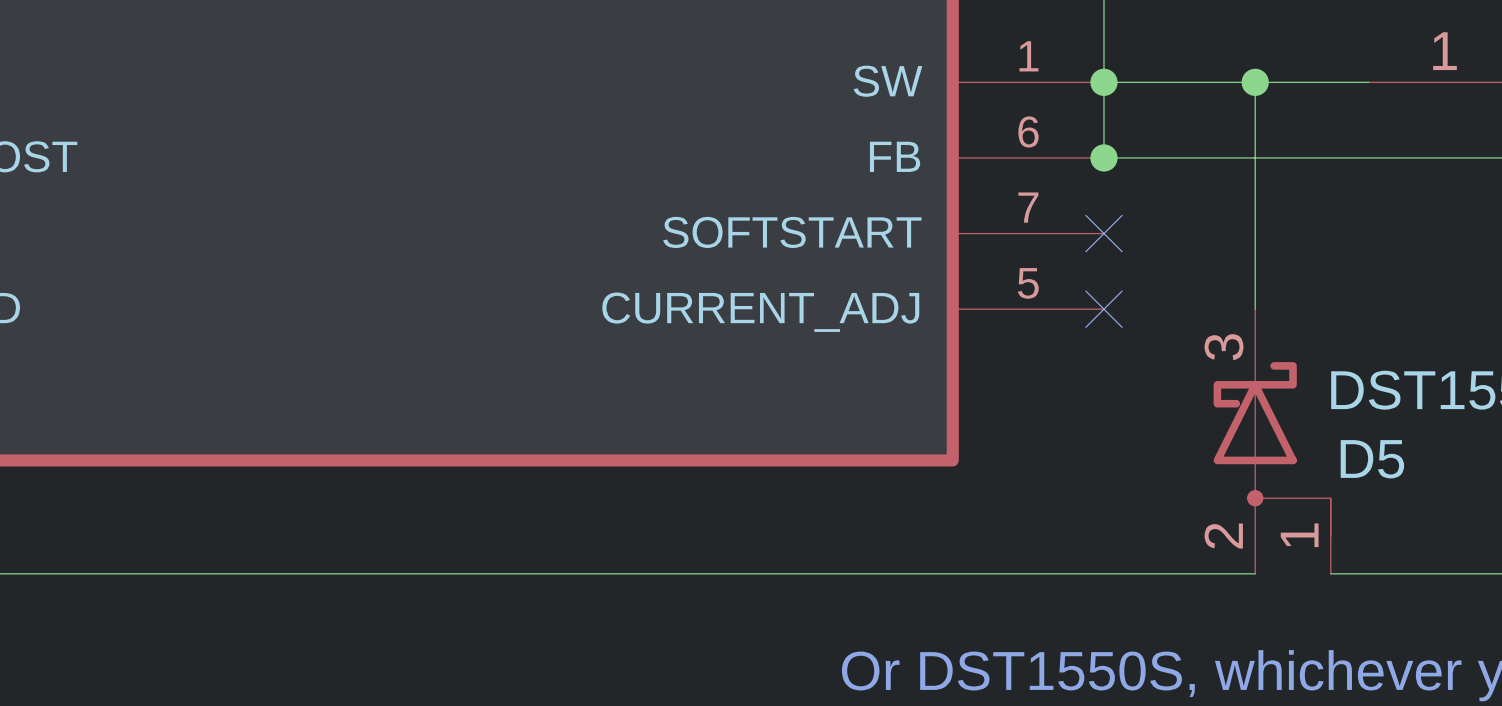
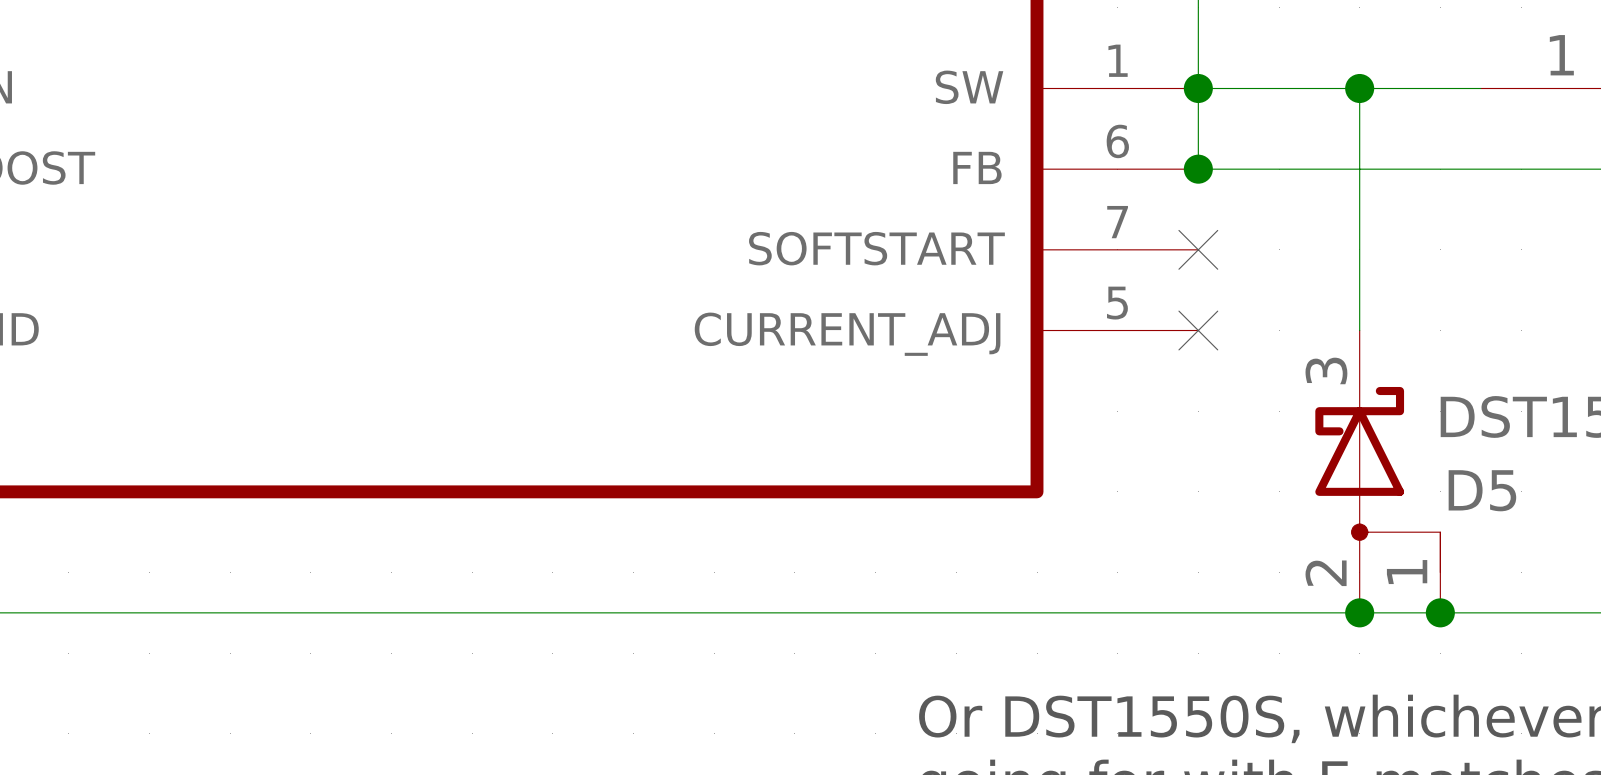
wire: none -> (1359, 612) (1440, 612)
junction: none -> (1359, 612)
junction: none -> (1440, 612)

